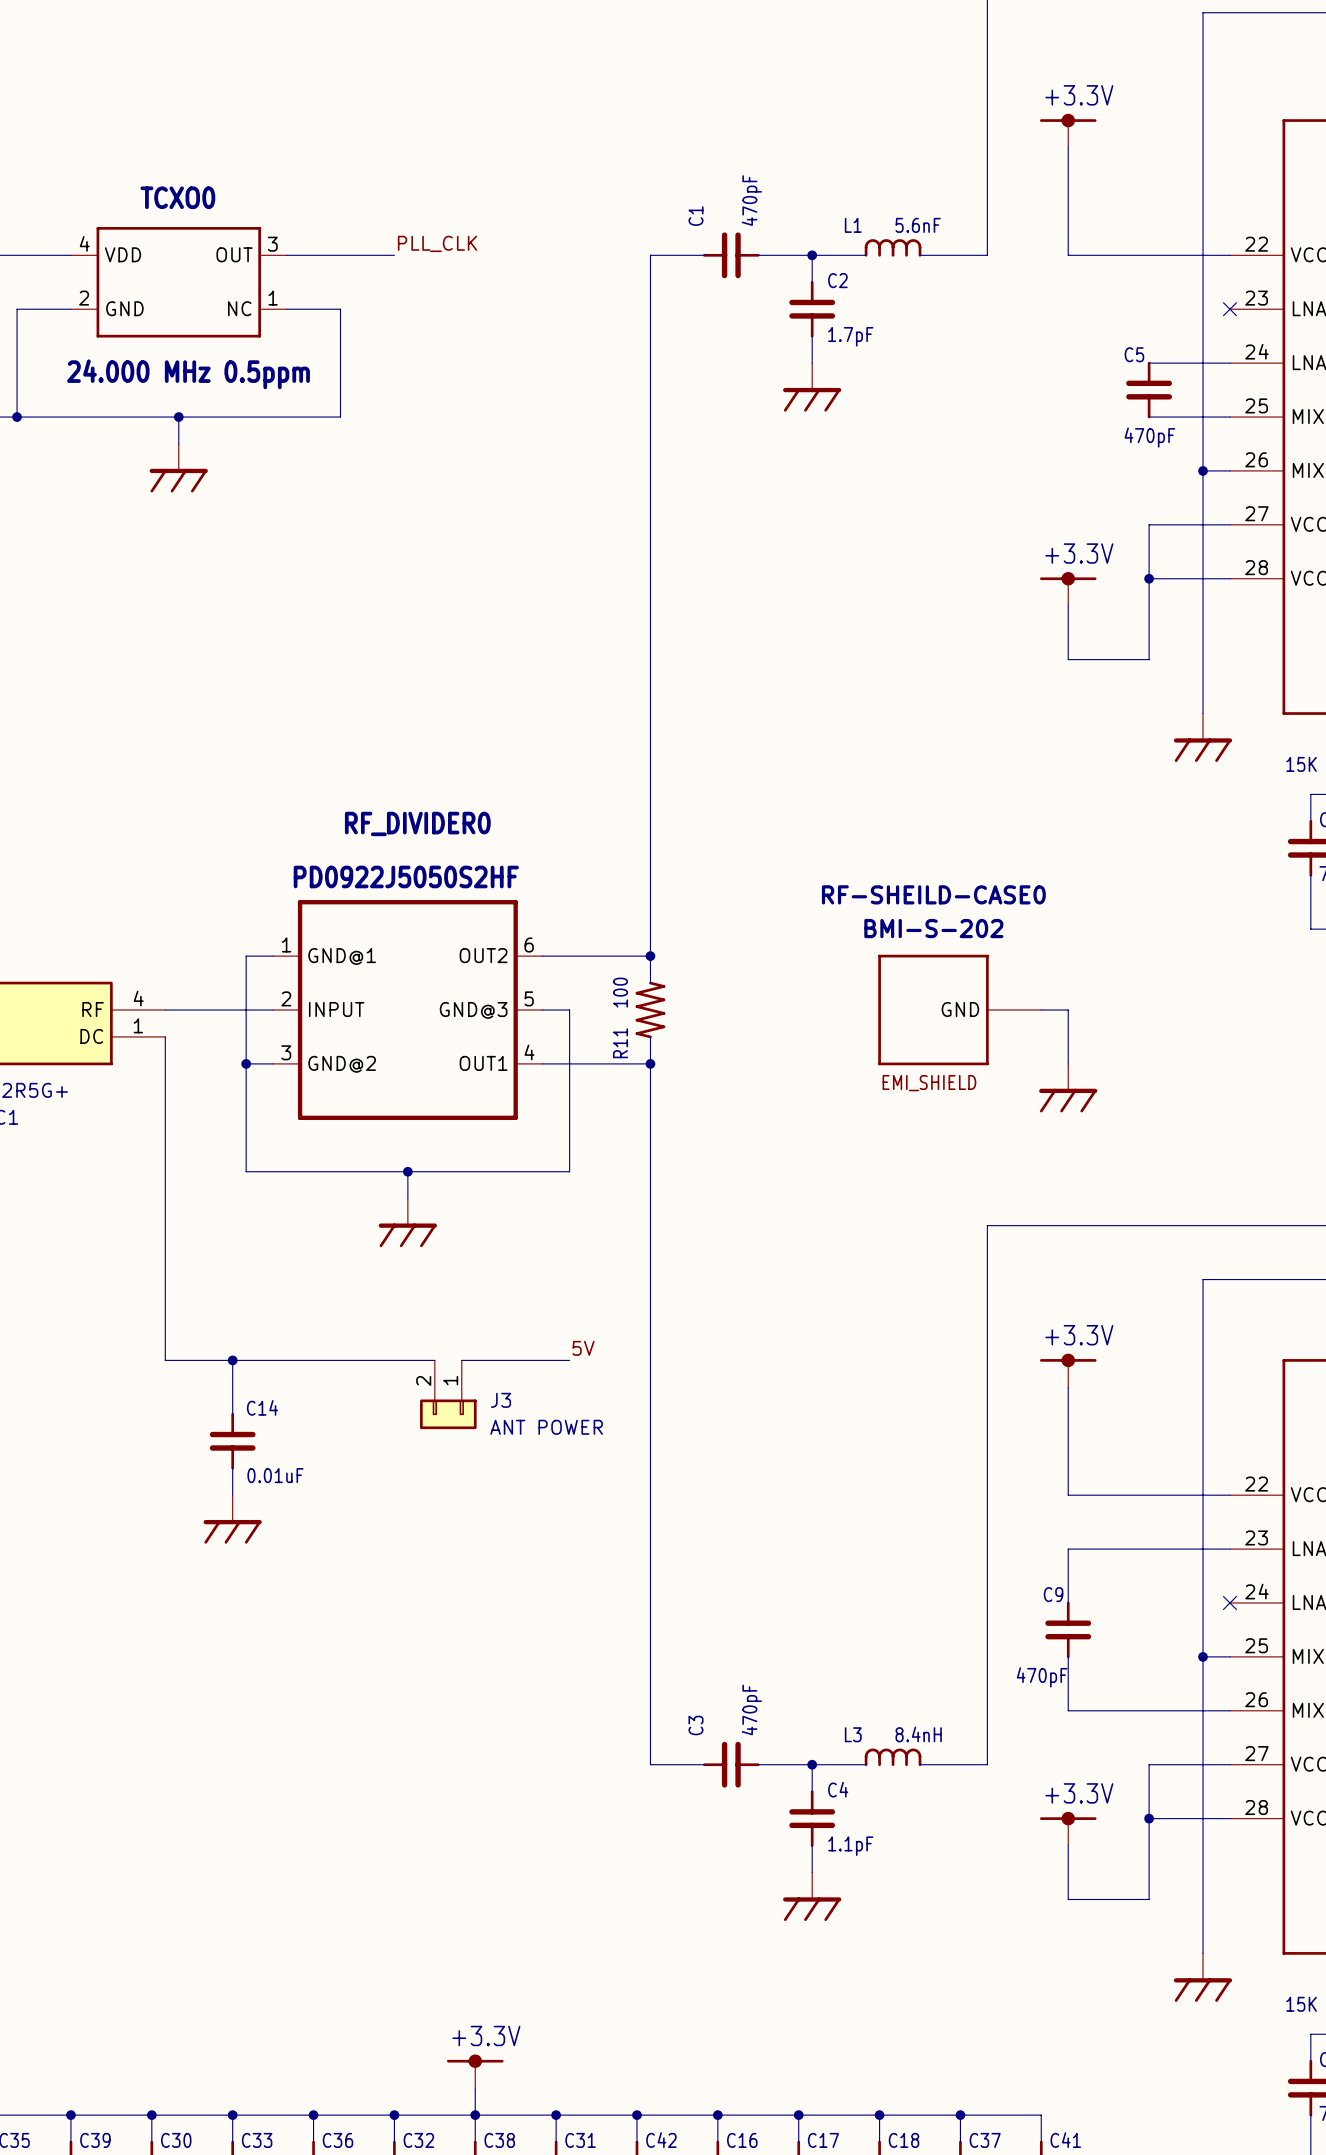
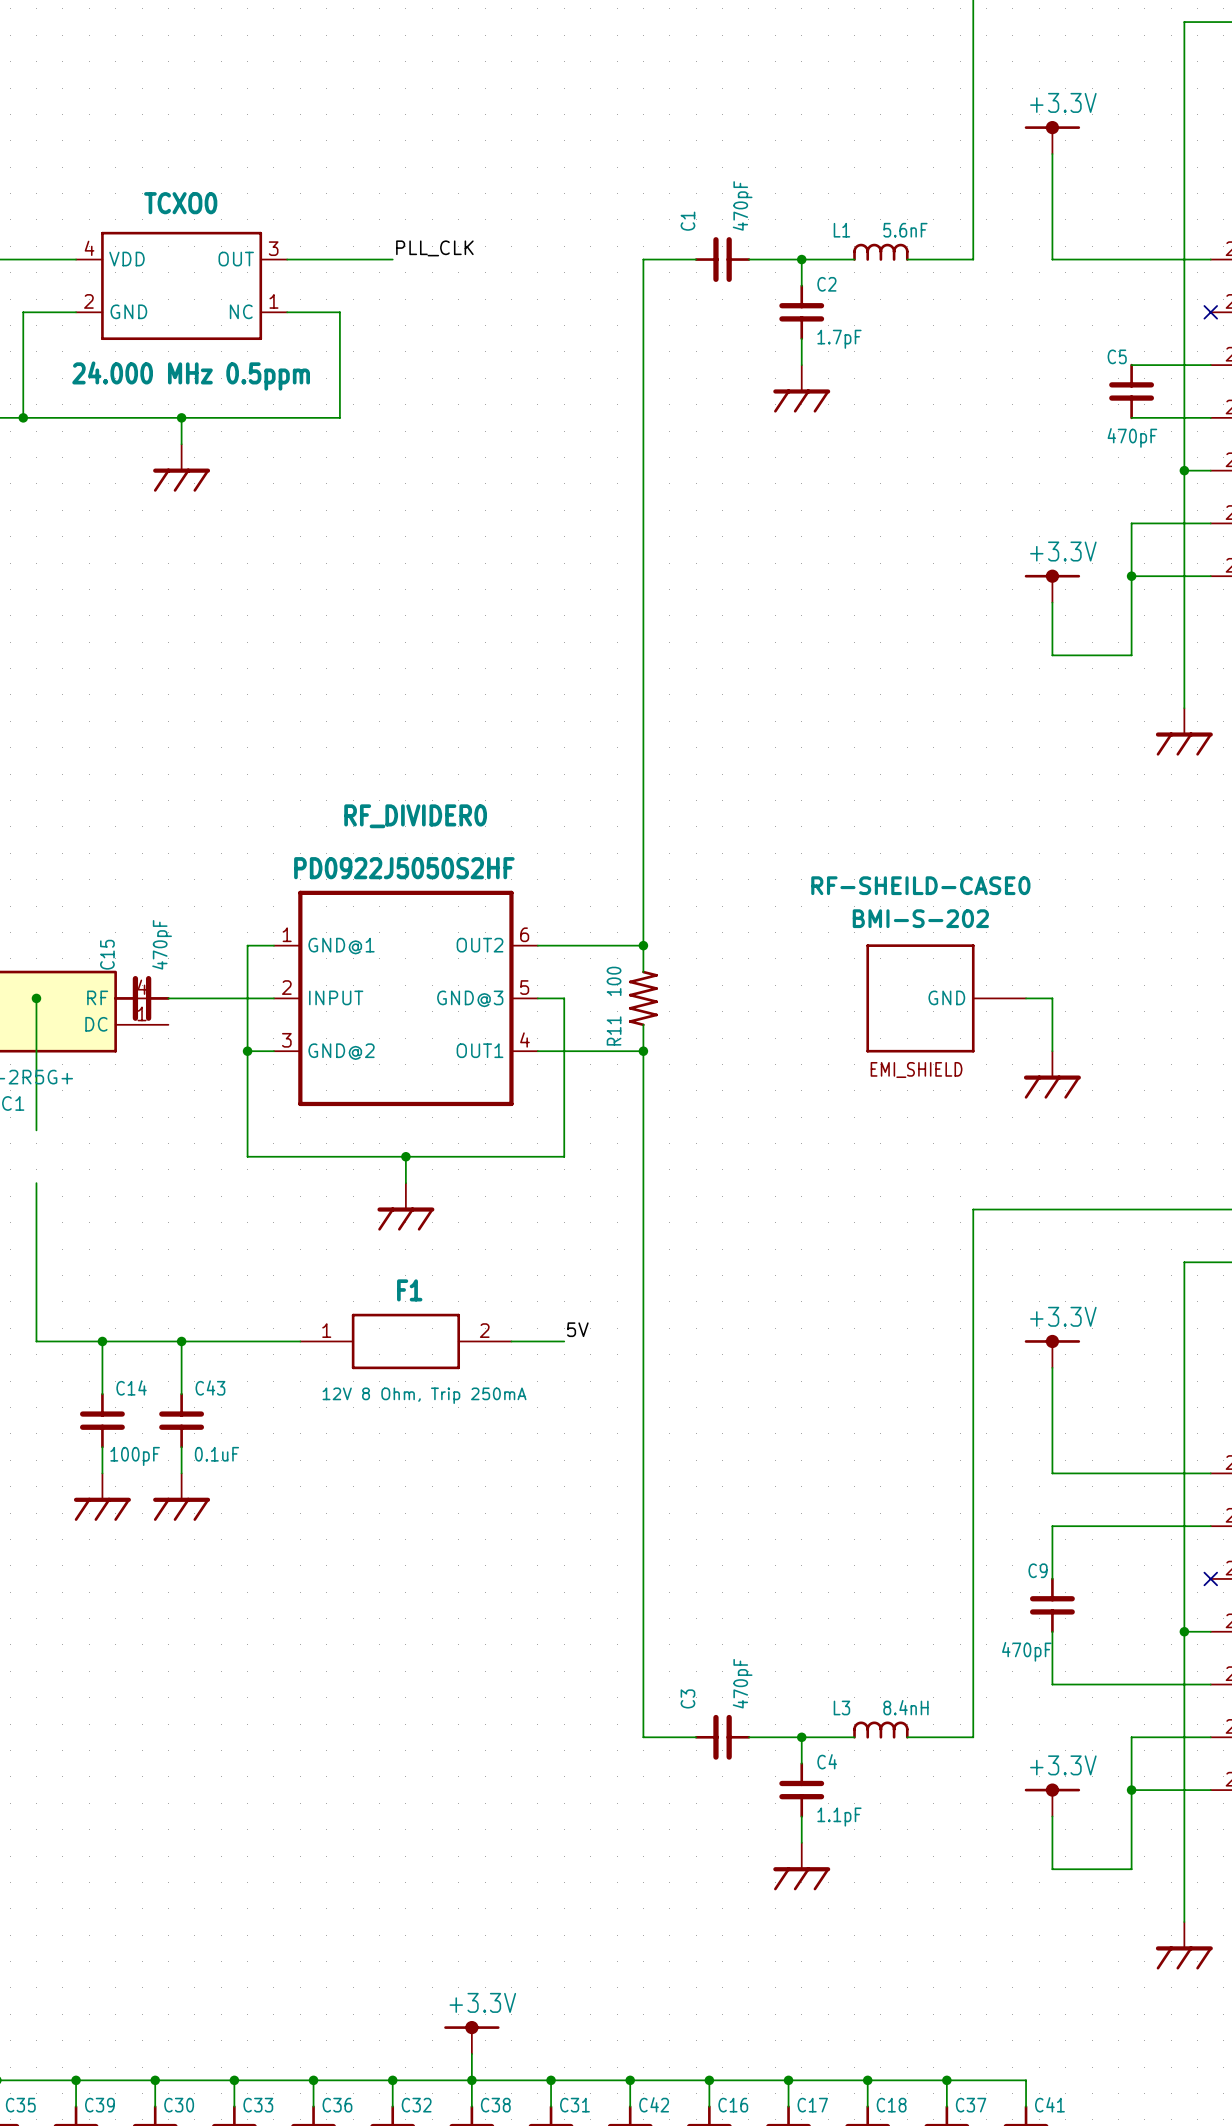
wire: none -> (36, 998) (36, 1130)
junction: none -> (36, 998)
C15: none -> 470pF (142, 998)
wire: (165, 1036) (165, 1360) -> (36, 1183) (36, 1341) (168, 1341)
wire: none -> (102, 1341) (102, 1394)
junction: none -> (102, 1341)
wire: (232, 1360) (232, 1414) -> (181, 1341) (181, 1394)
junction position: (232, 1360) -> (181, 1341)
wire: (300, 1360) (434, 1360) -> none
F1: none -> 12V 8 Ohm, Trip 250mA (405, 1341)
J3: ANT POWER (448, 1394) -> none
C43: none -> 0.1uF (181, 1420)
C14 position: (232, 1441) -> (102, 1420)
wire: none -> (102, 1447) (102, 1473)
wire: (232, 1468) (232, 1495) -> (181, 1447) (181, 1473)
C14 value: 0.01uF (275, 1475) -> 100pF (135, 1456)
power symbol: none -> (102, 1497)
power symbol position: (232, 1519) -> (181, 1497)

